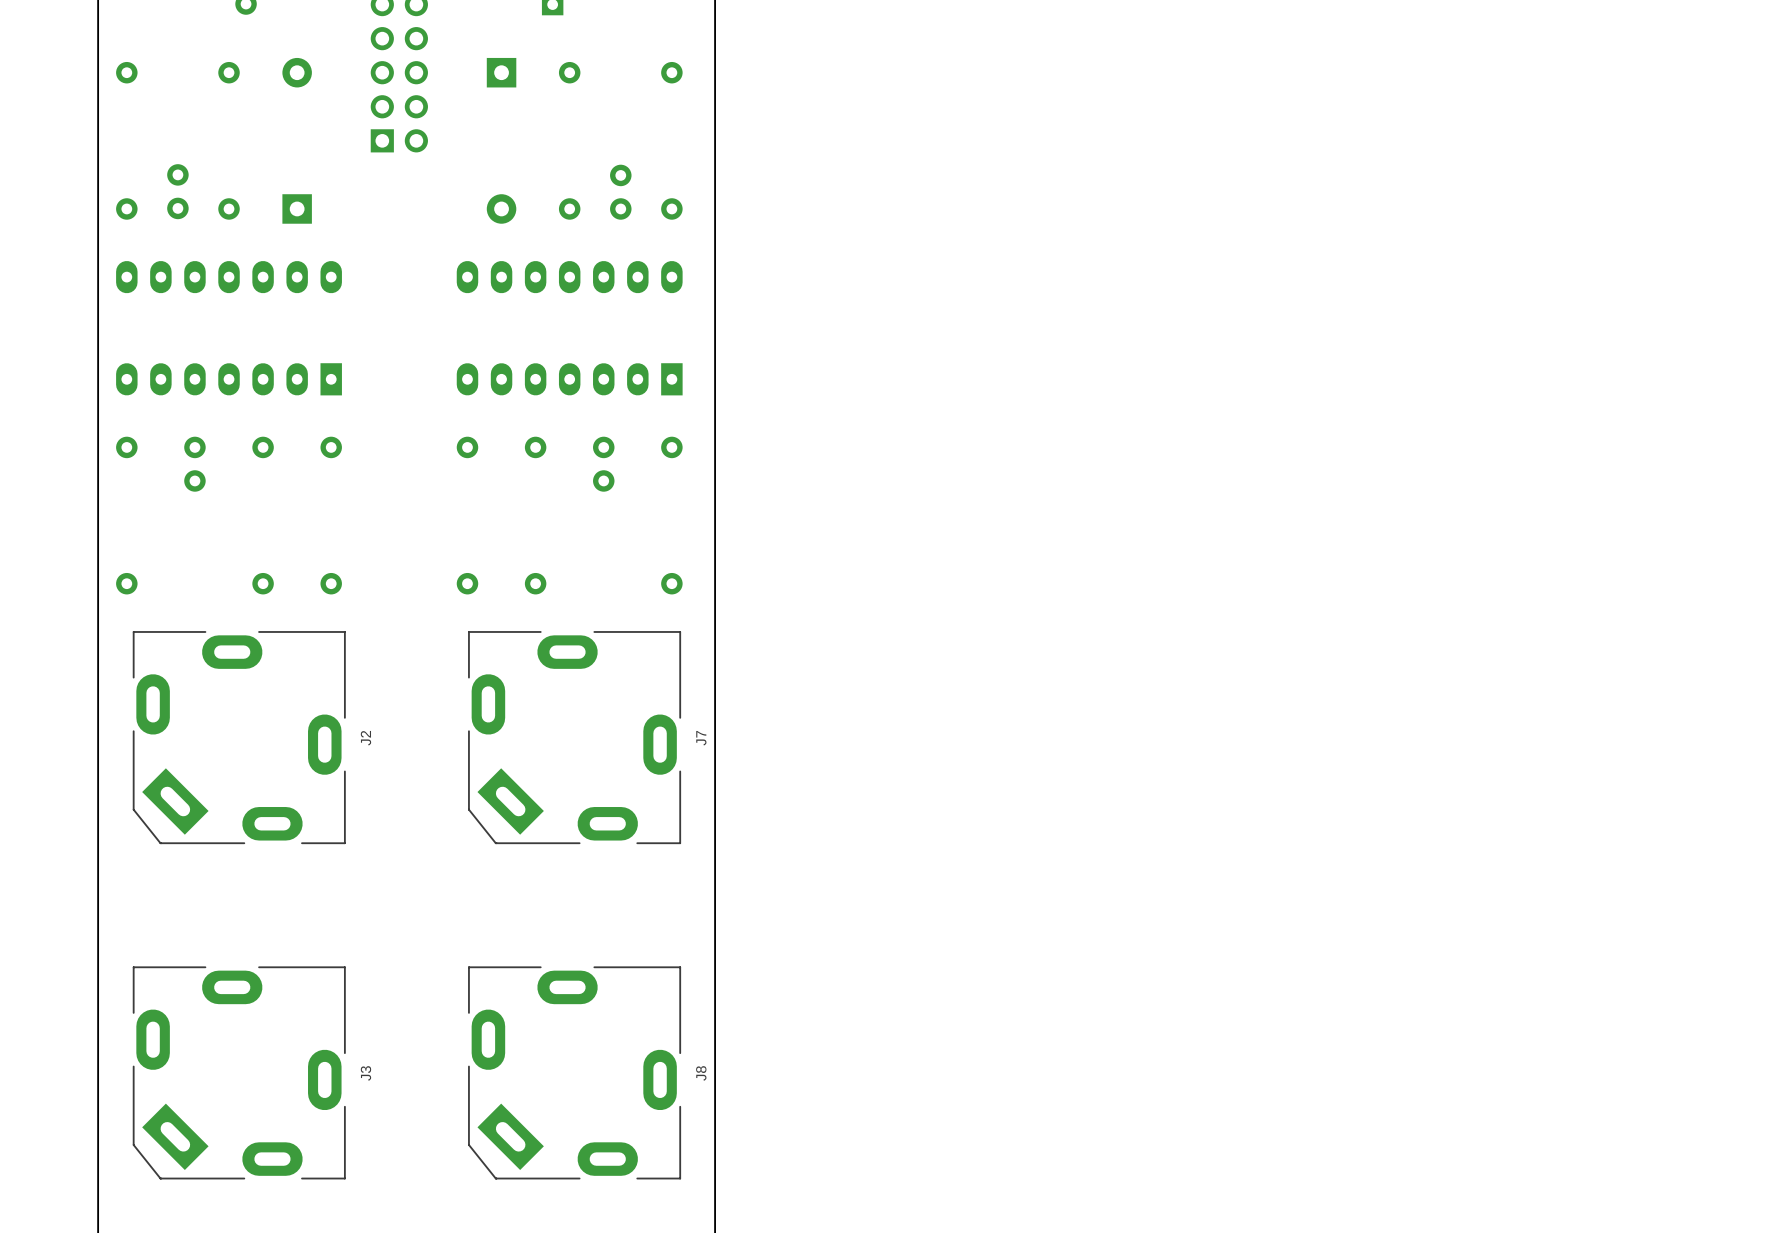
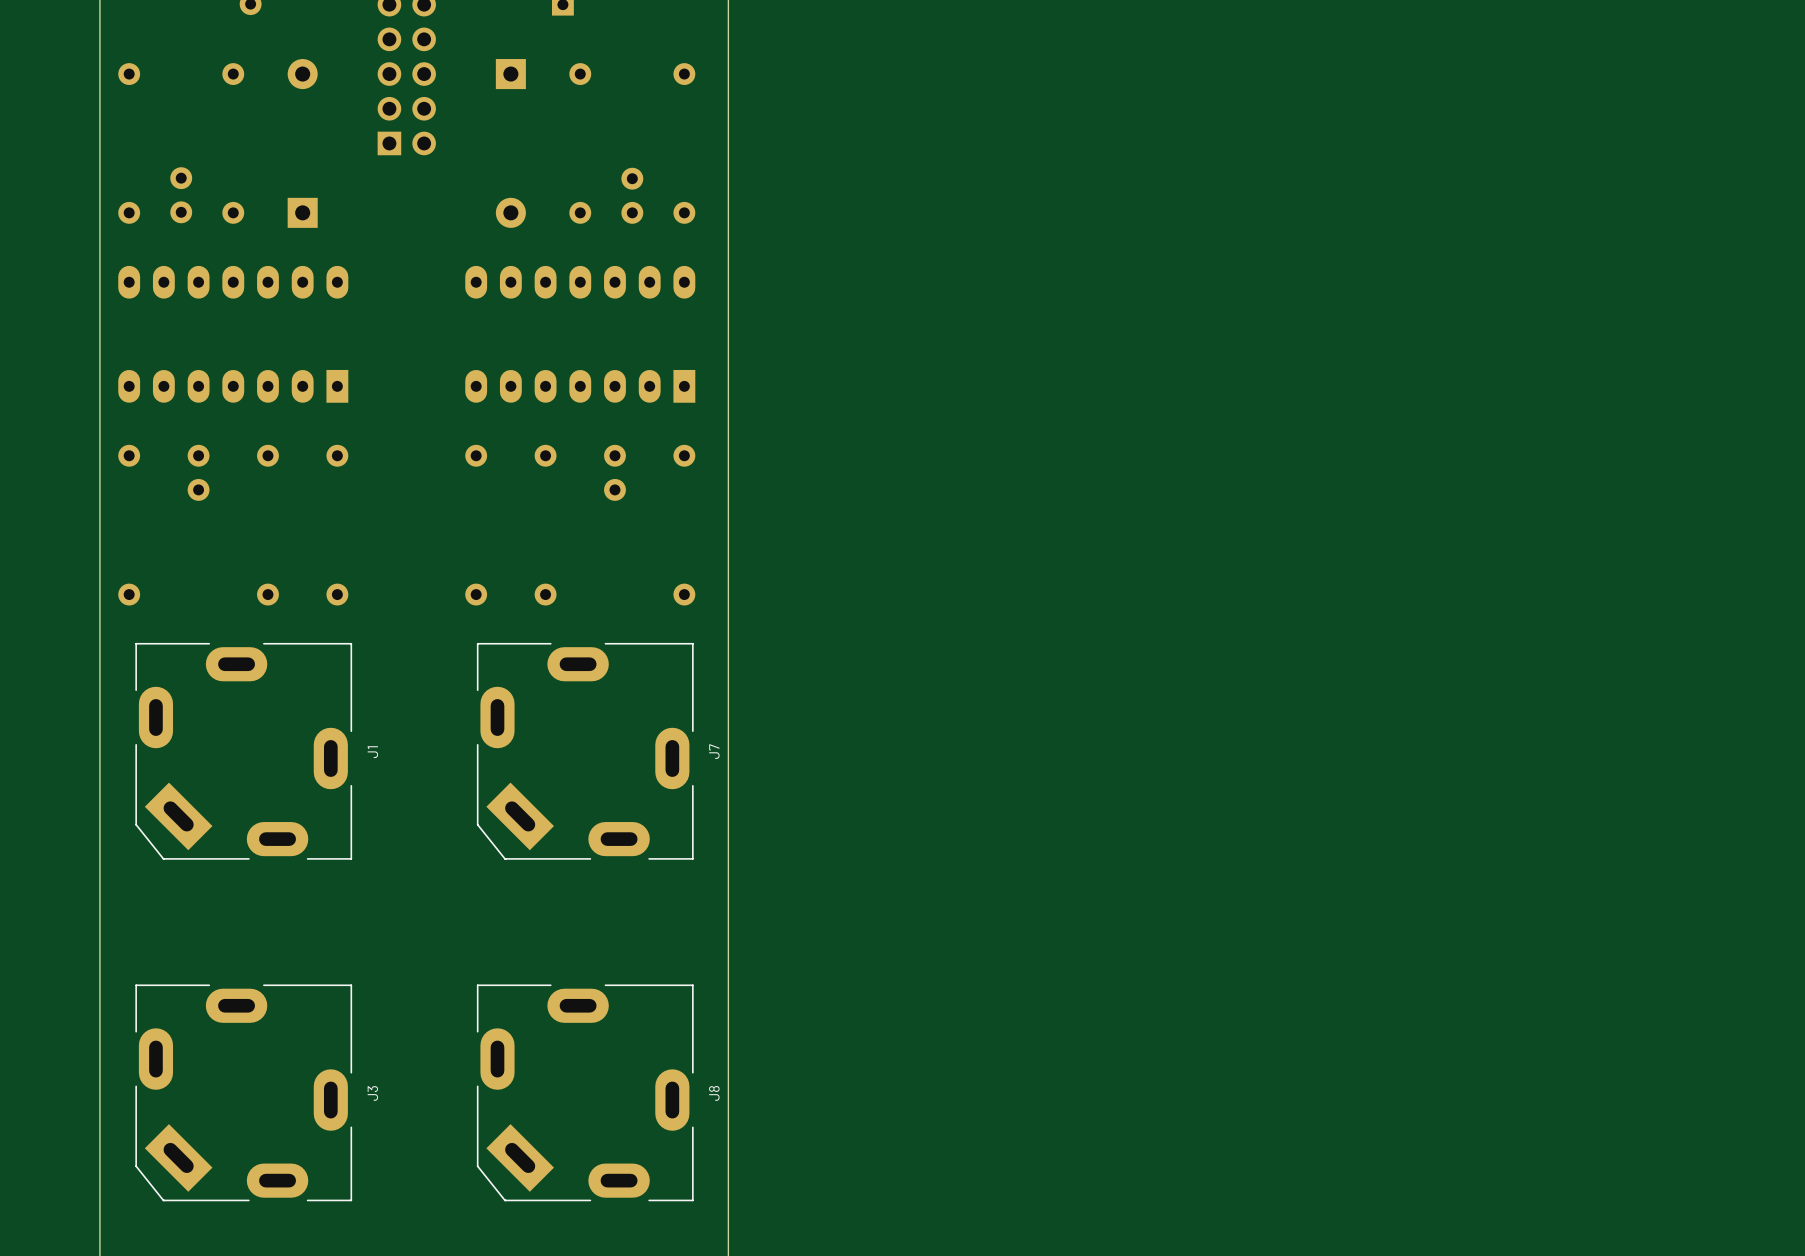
J2 name: J2 (365, 738) -> J1 (372, 752)

